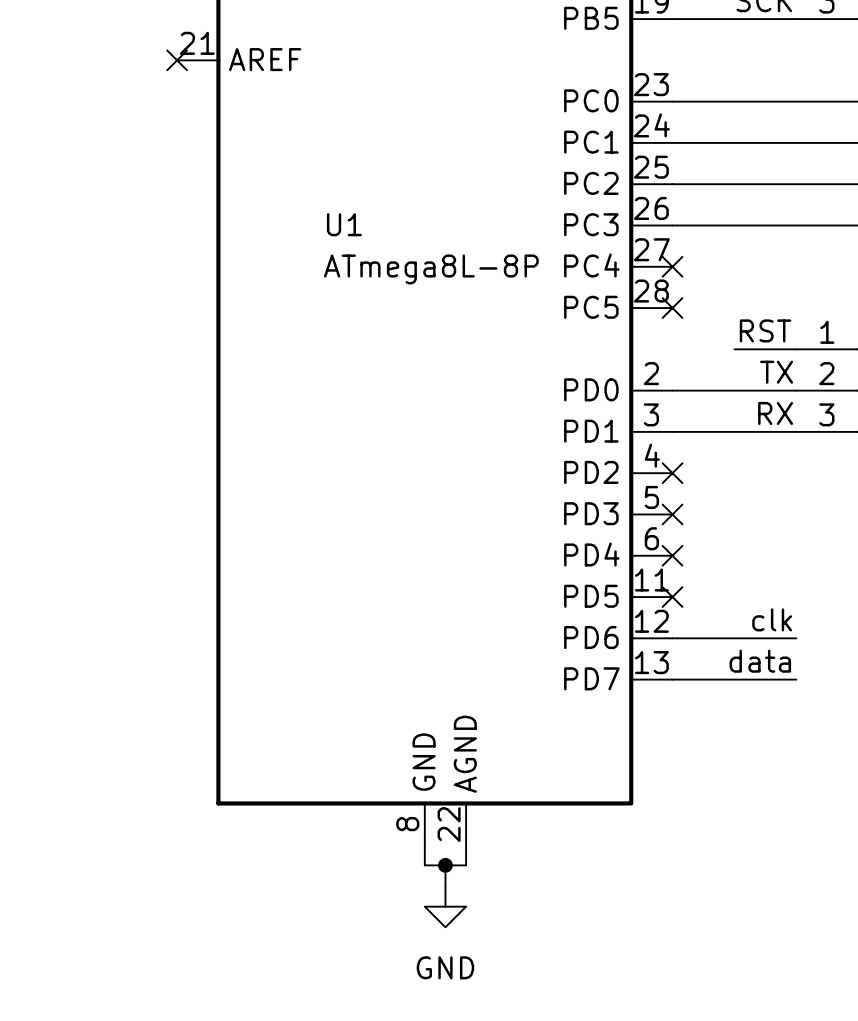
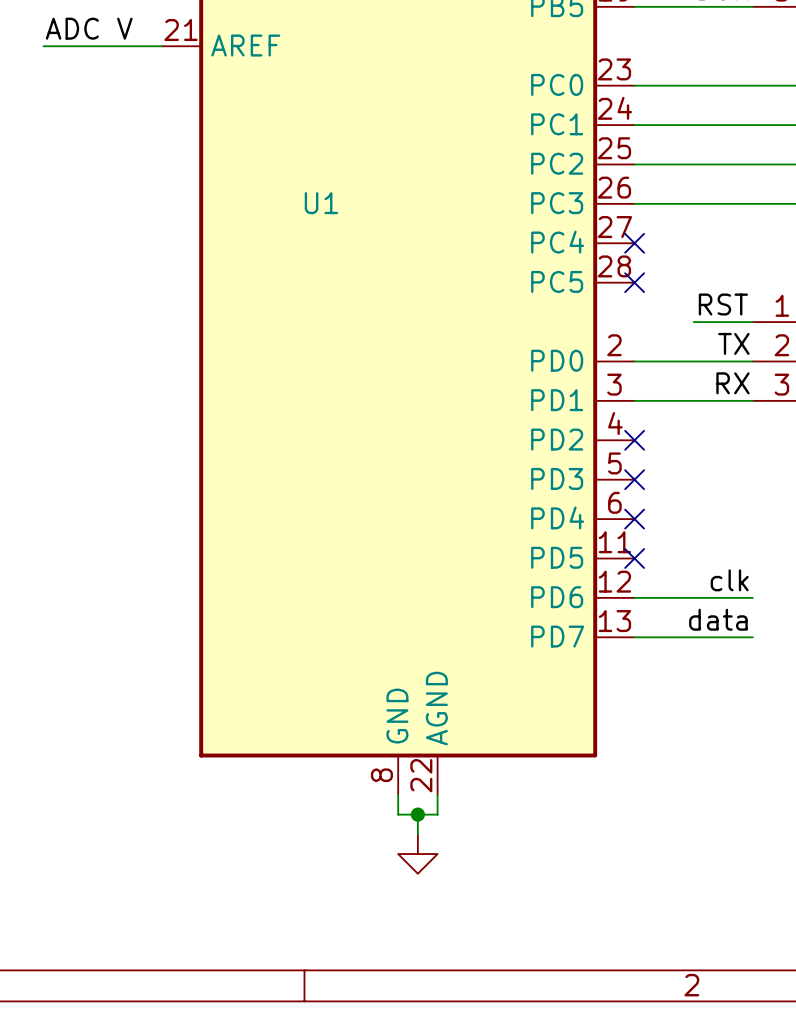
label: none -> ADC V (89, 28)
wire: none -> (43, 46) (161, 46)
no-connect mark: (177, 60) -> none
U1 value: ATmega8L-8P (431, 269) -> none
power symbol text: GND (445, 967) -> none

